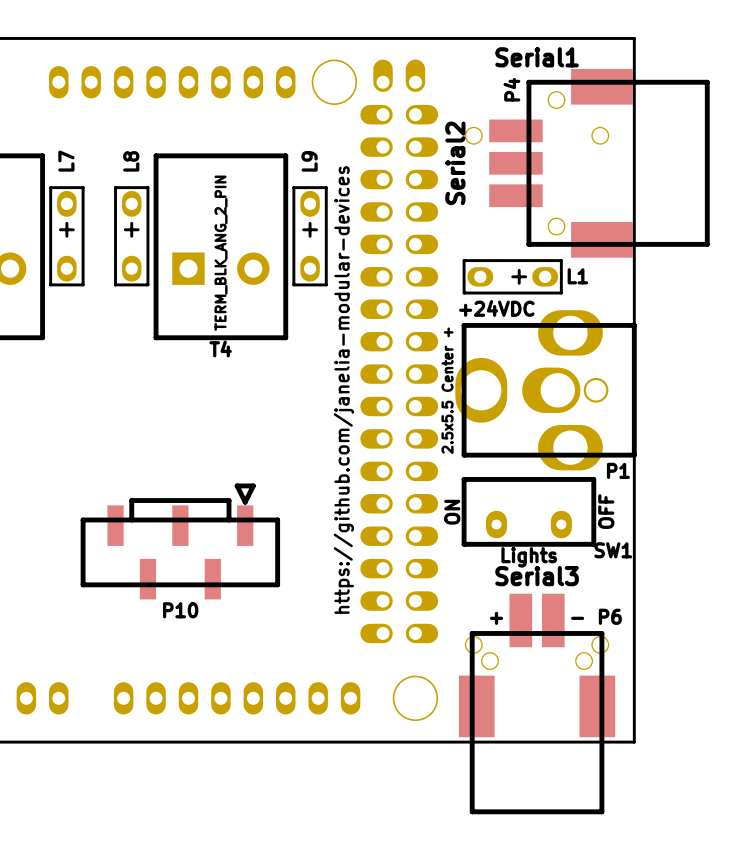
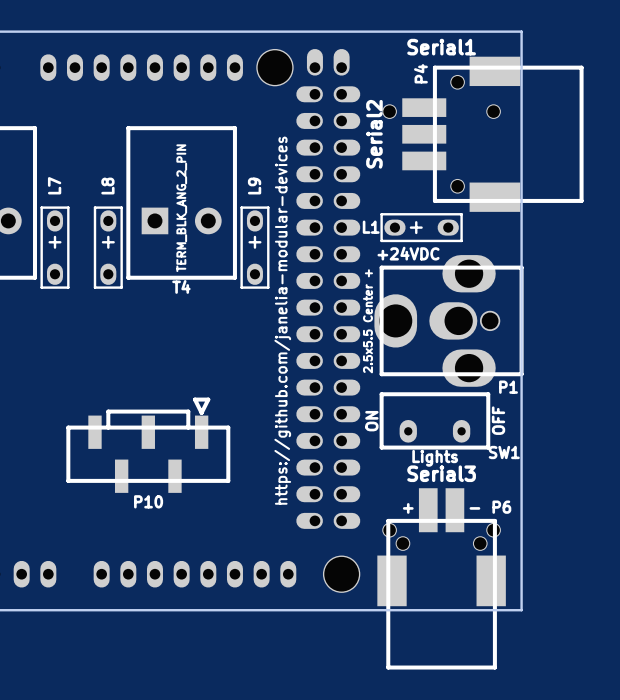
L7 position: (66, 236) -> (55, 247)
L8 position: (131, 236) -> (108, 247)
L9 position: (310, 236) -> (254, 247)
L1 rotation: 0° (512, 276) -> 180° (421, 227)

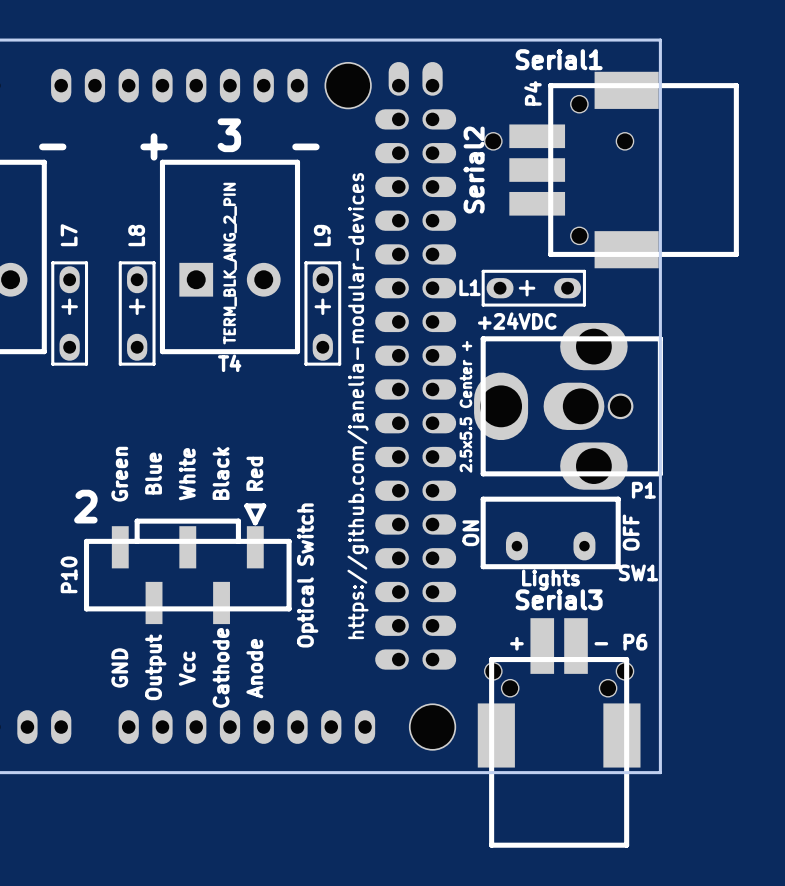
text: none -> 3 (229, 135)
text: none -> - (52, 146)
text: none -> + (154, 146)
text: none -> - (305, 146)
P10 footprint: [66, 397, 231, 493] -> [83, 503, 292, 625]
text: none -> 2 (85, 506)
P10 name position: P10 (148, 501) -> P10 (69, 574)

